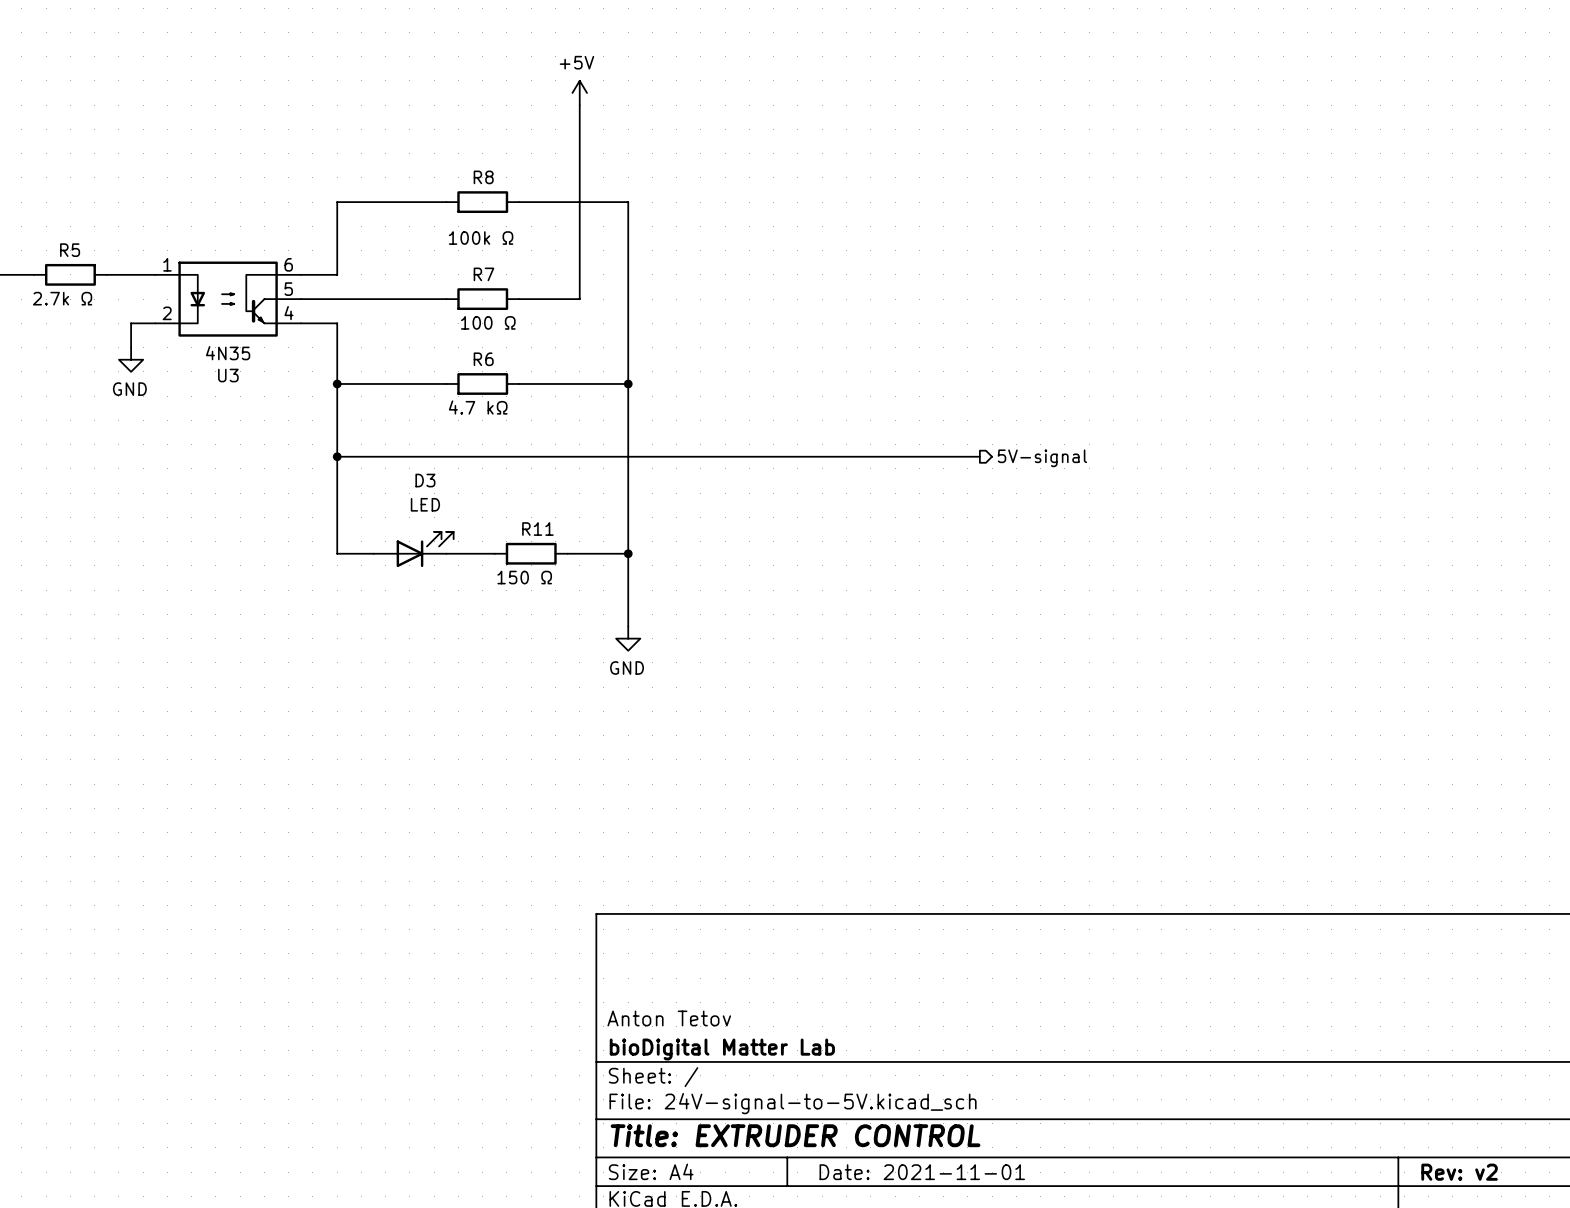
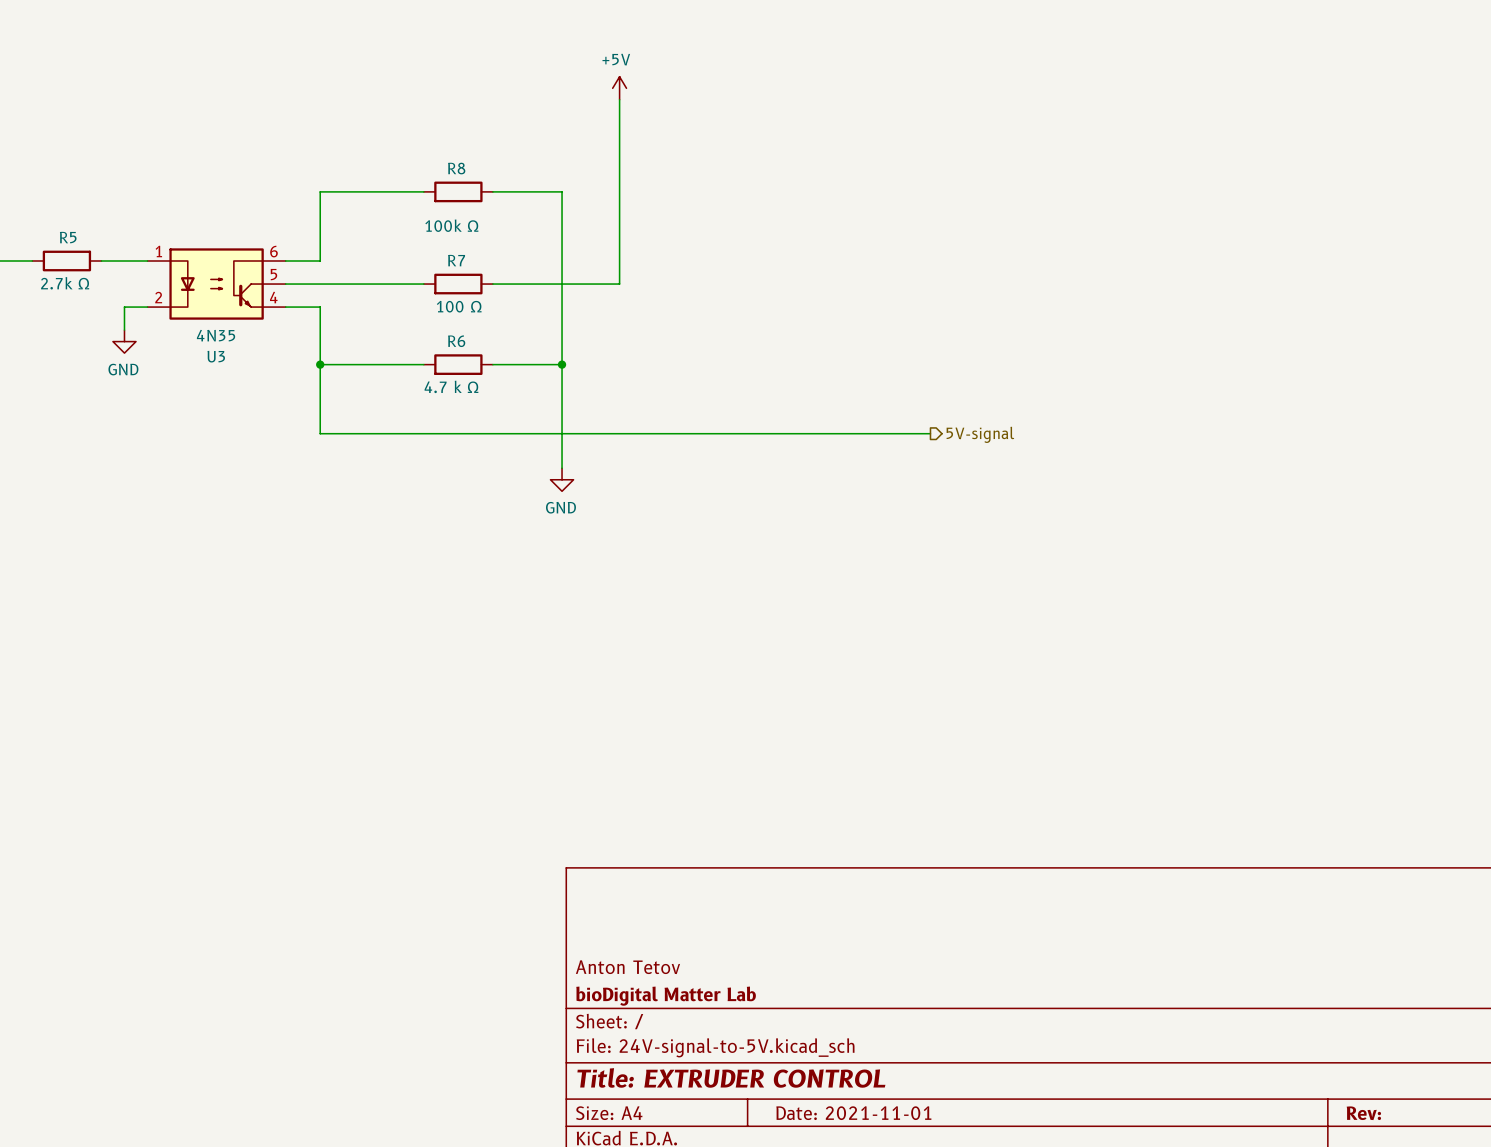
power symbol position: +5V (579, 92) -> +5V (619, 88)
wire: (579, 105) (579, 299) -> (619, 99) (619, 284) (550, 284)
wire: (591, 202) (628, 202) (628, 626) -> (562, 191) (562, 468)
wire: (591, 383) (628, 383) -> none
junction position: (628, 383) -> (562, 364)
R6 value: 4.7 kΩ (478, 407) -> 4.7 k Ω (451, 386)
wire: (337, 456) (337, 553) (373, 553) -> none
junction: (337, 456) -> none
D3: LED (413, 549) -> none
wire: (446, 553) (494, 553) -> none
R11: 150 Ω (531, 553) -> none
wire: (567, 553) (628, 553) -> none
junction: (628, 553) -> none
power symbol position: GND (628, 638) -> GND (562, 479)
title block: Rev: v2 (1459, 1172) -> Rev: (1363, 1113)

